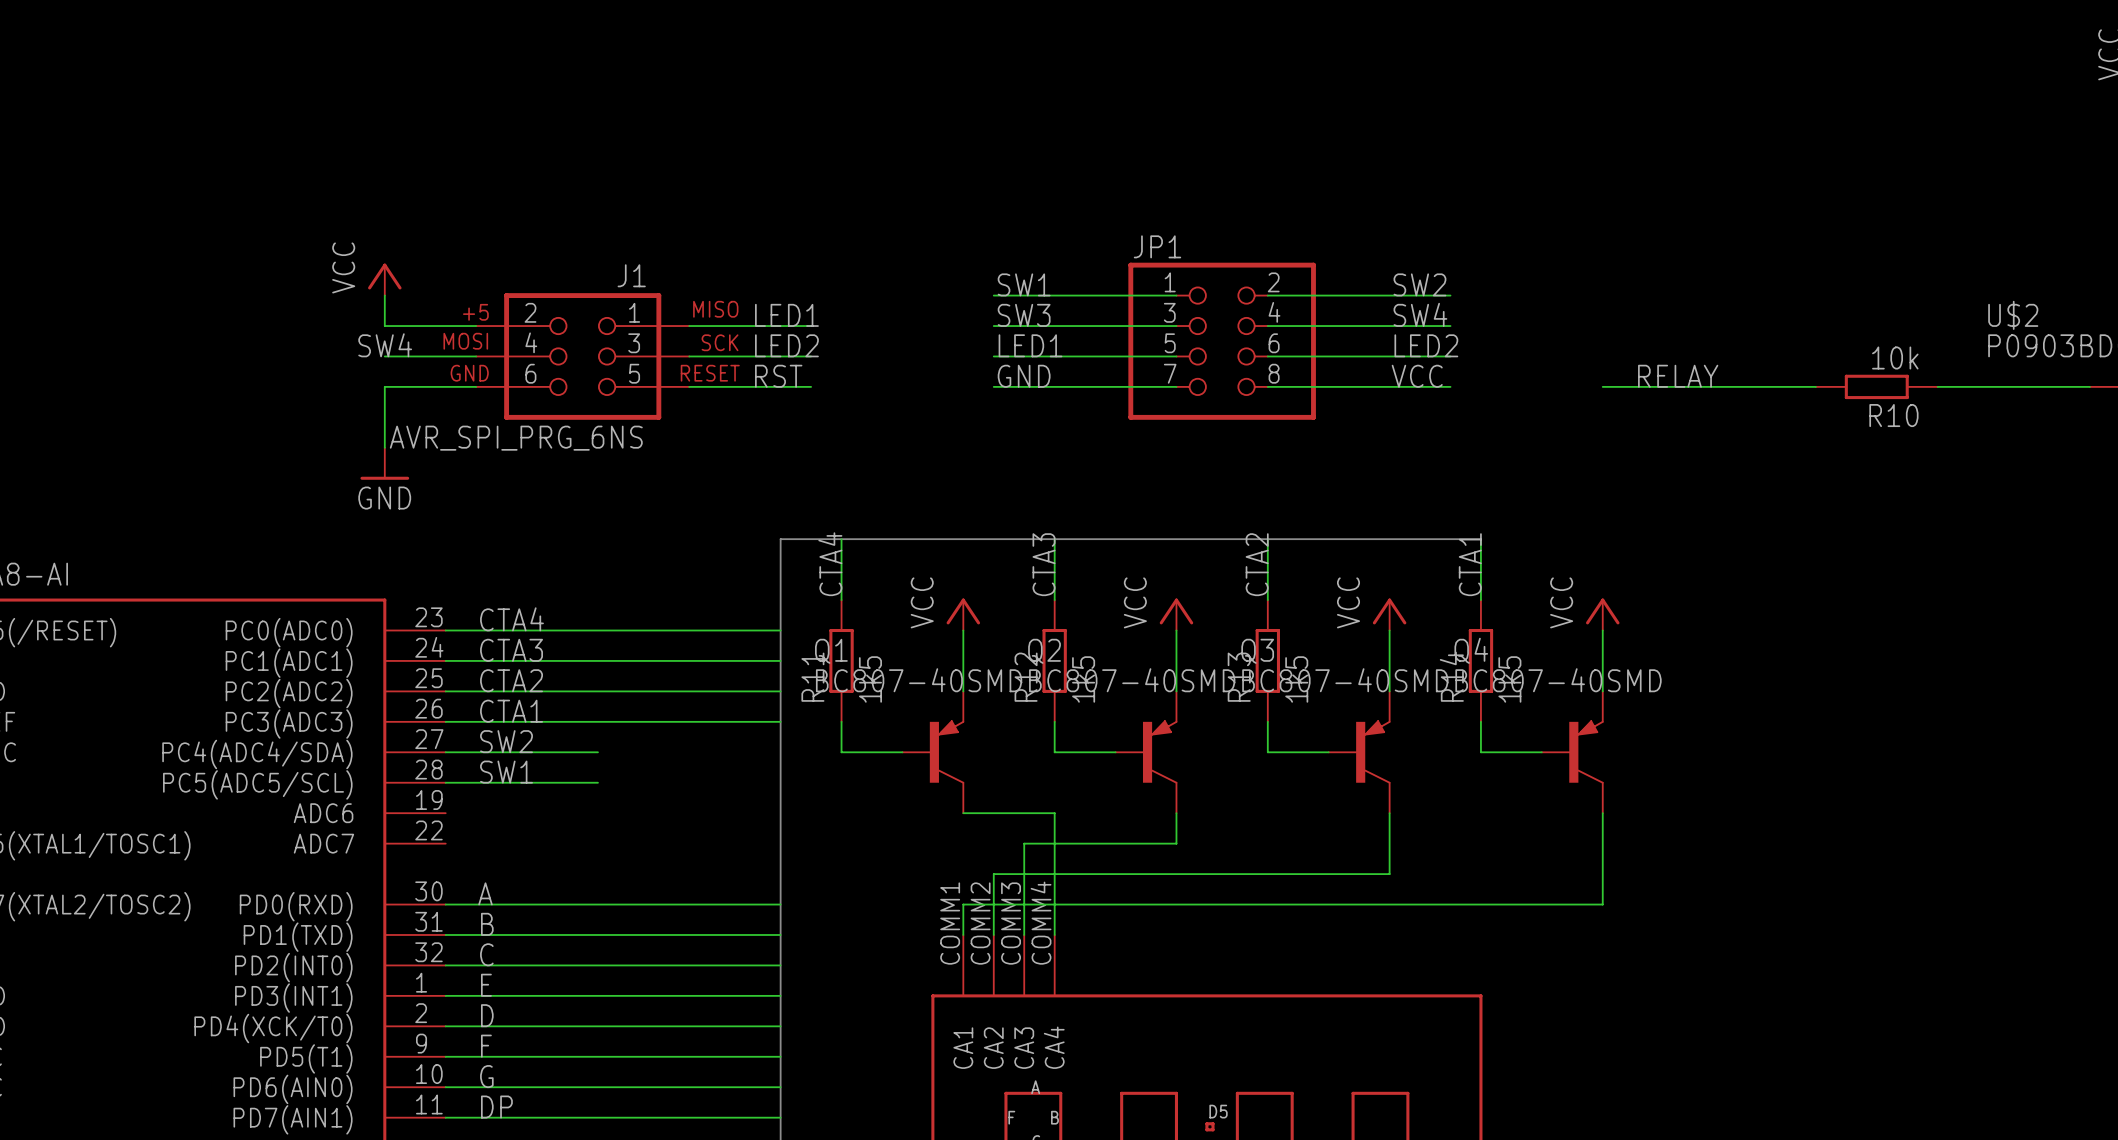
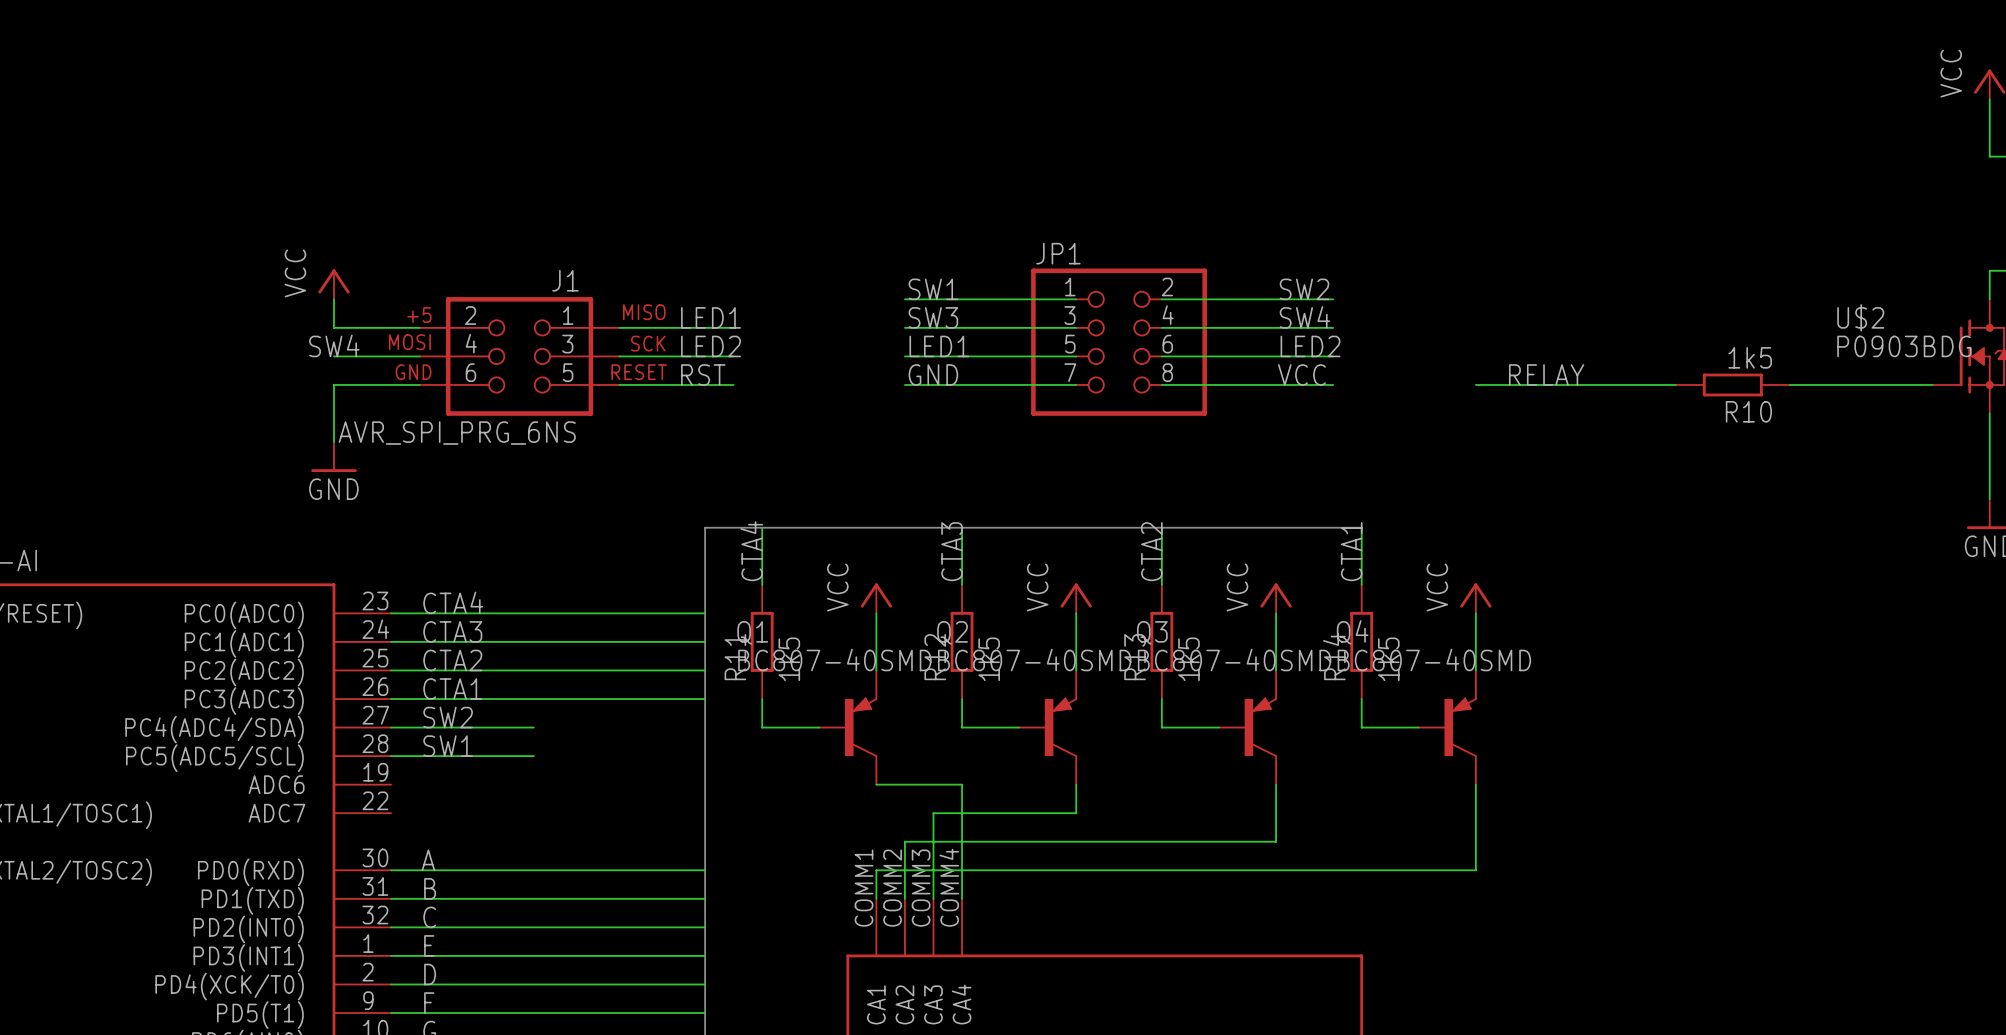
R10 value: 10k (1895, 357) -> 1k5 (1750, 357)

